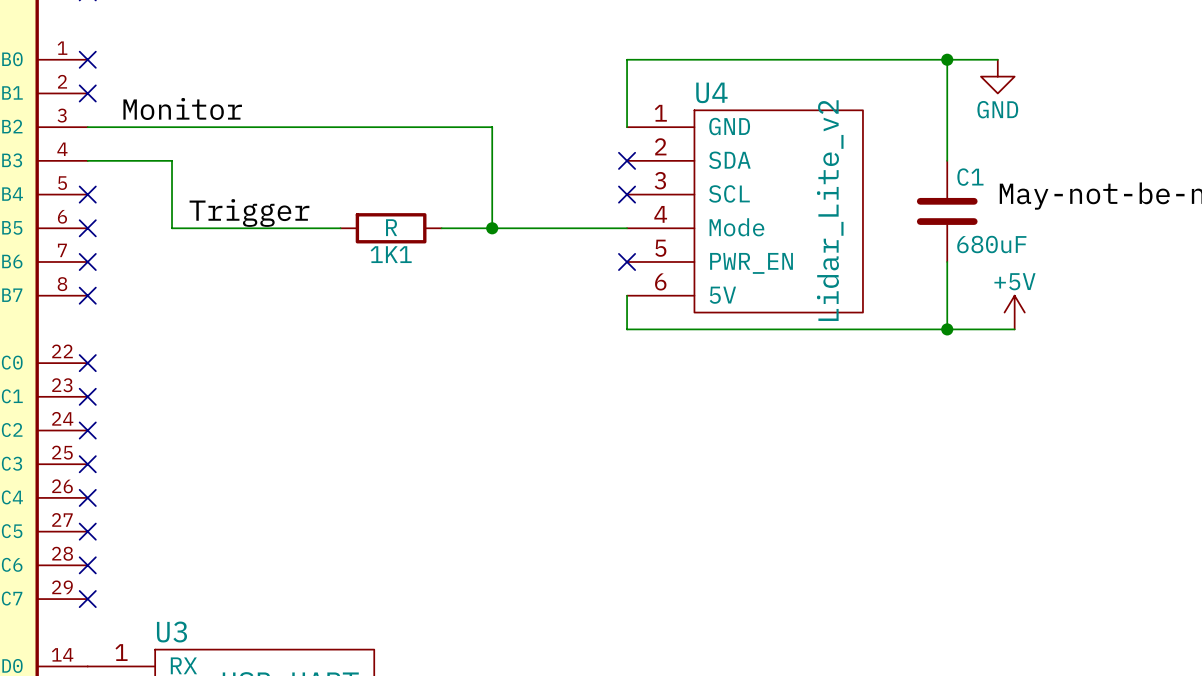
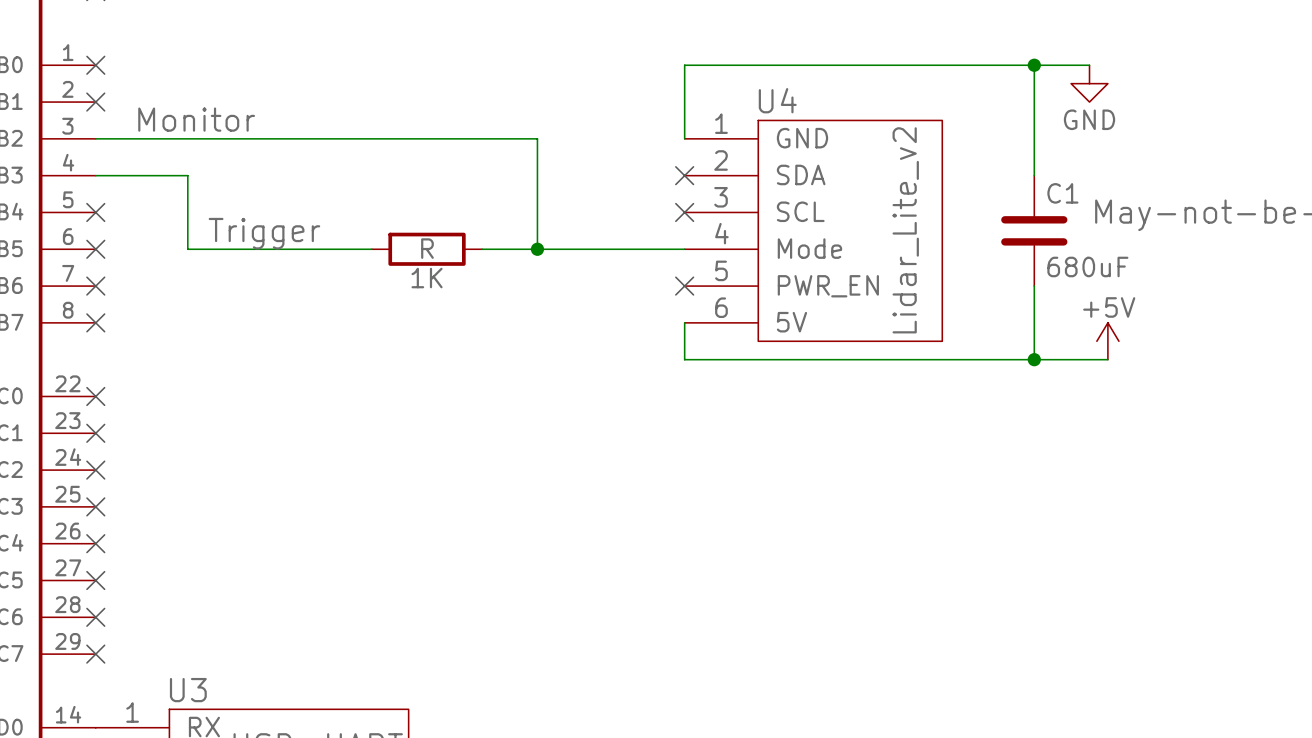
1K1 name: 1K1 (391, 254) -> 1K (427, 278)

